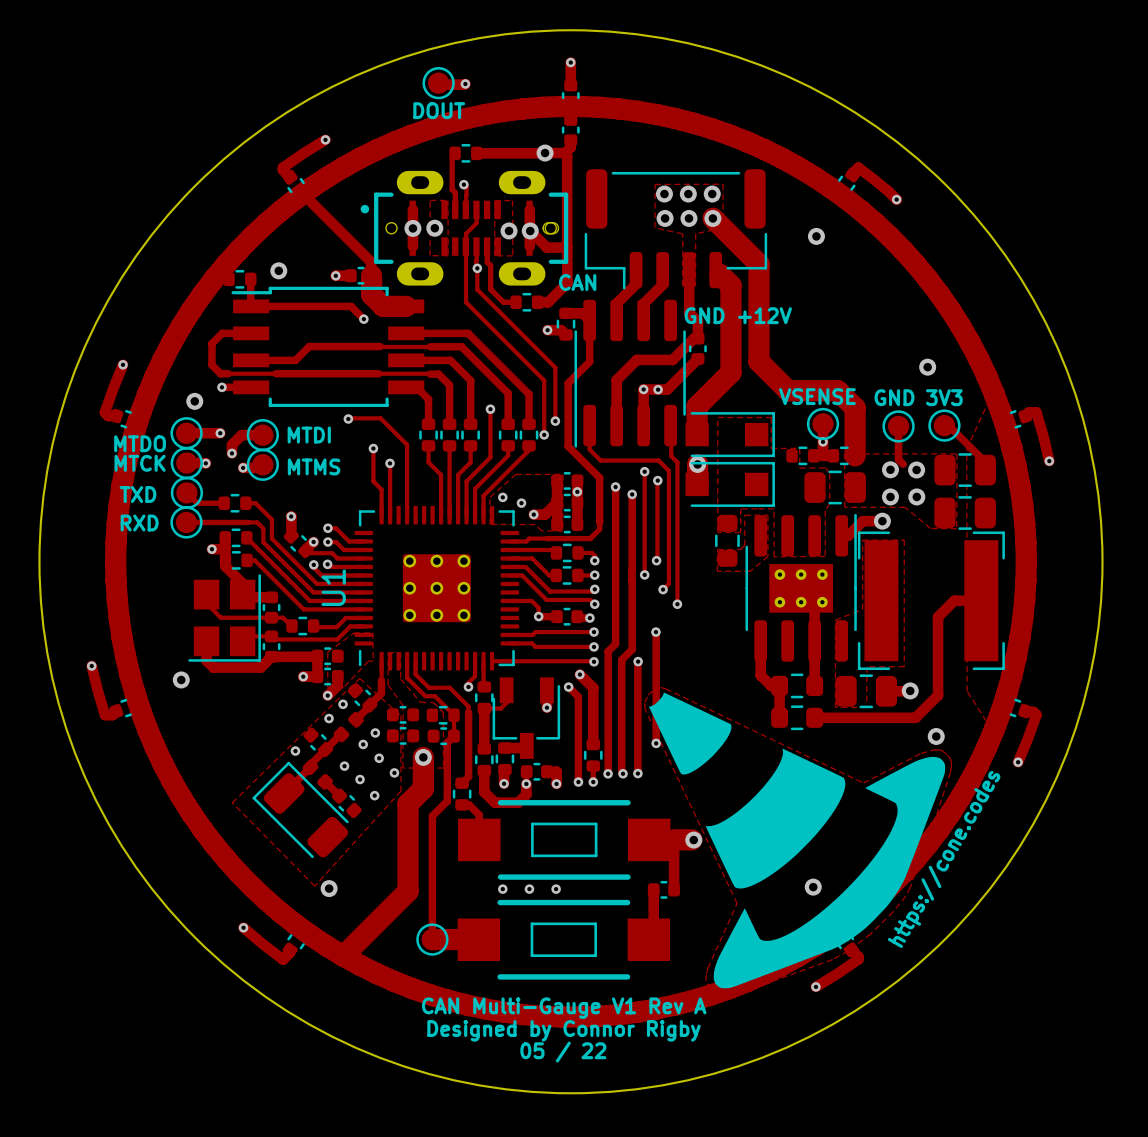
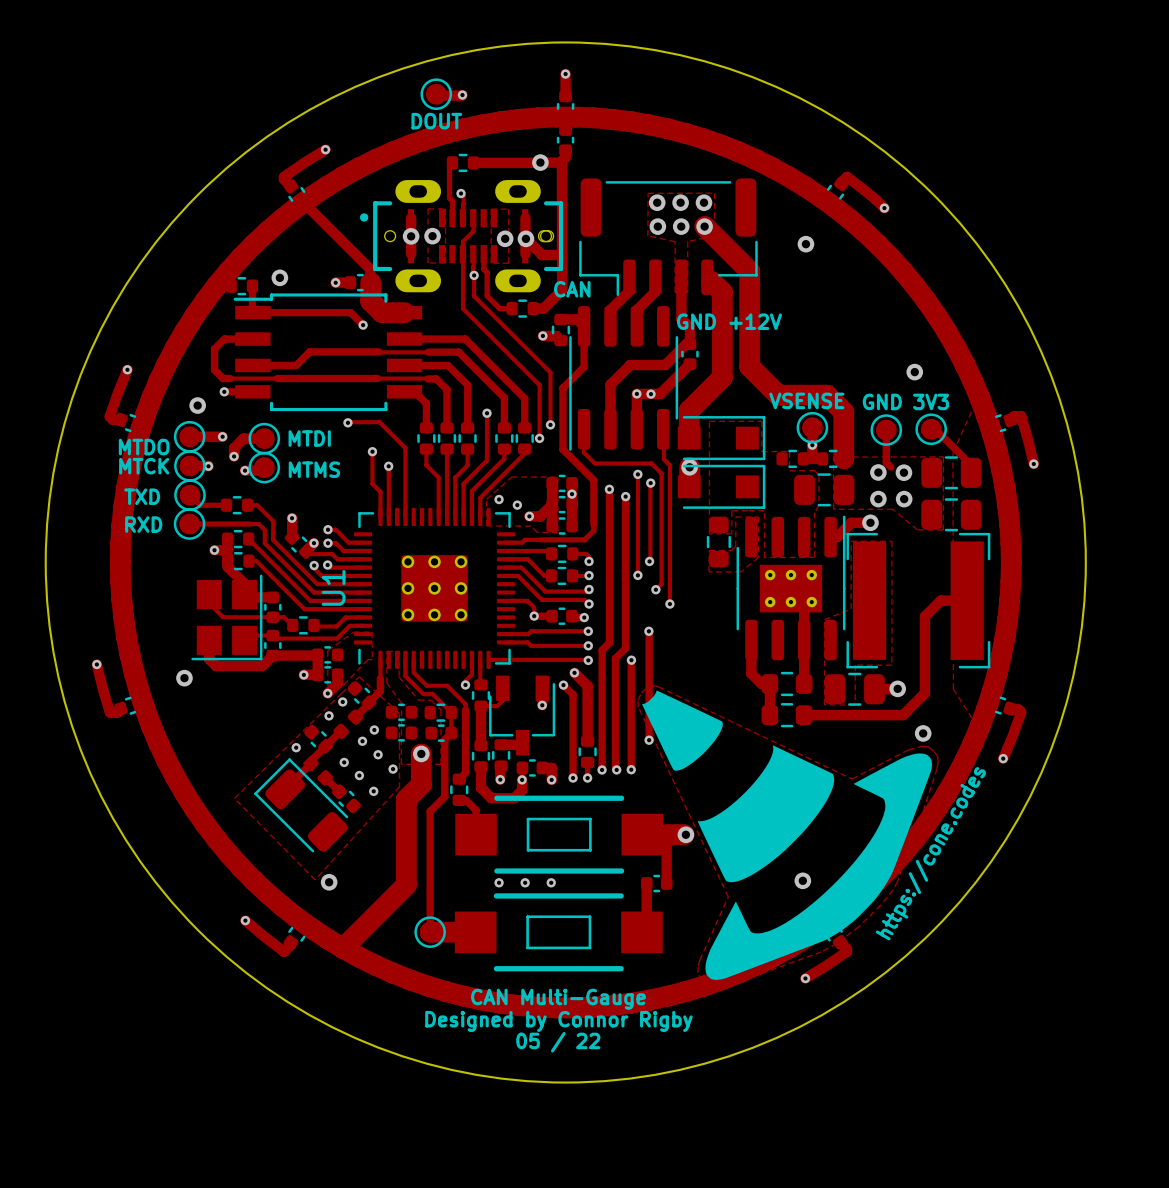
text: CAN Multi-Gauge V1 Rev A (564, 1008) -> CAN Multi-Gauge (558, 999)

